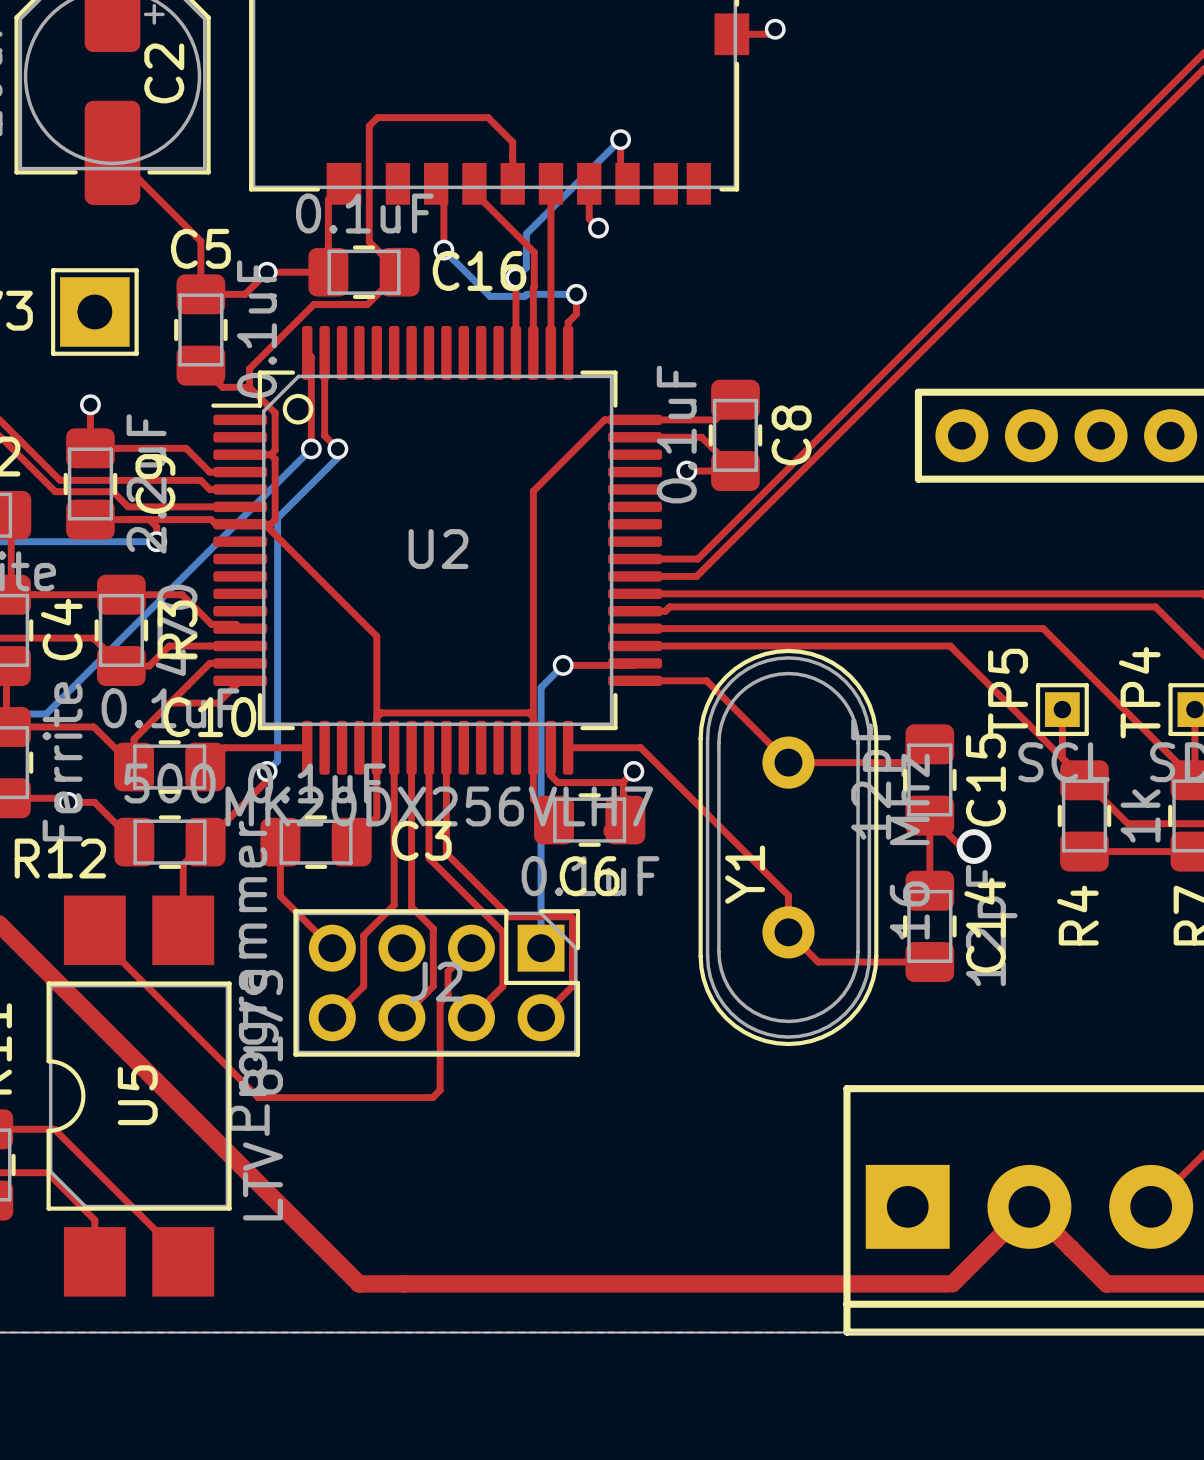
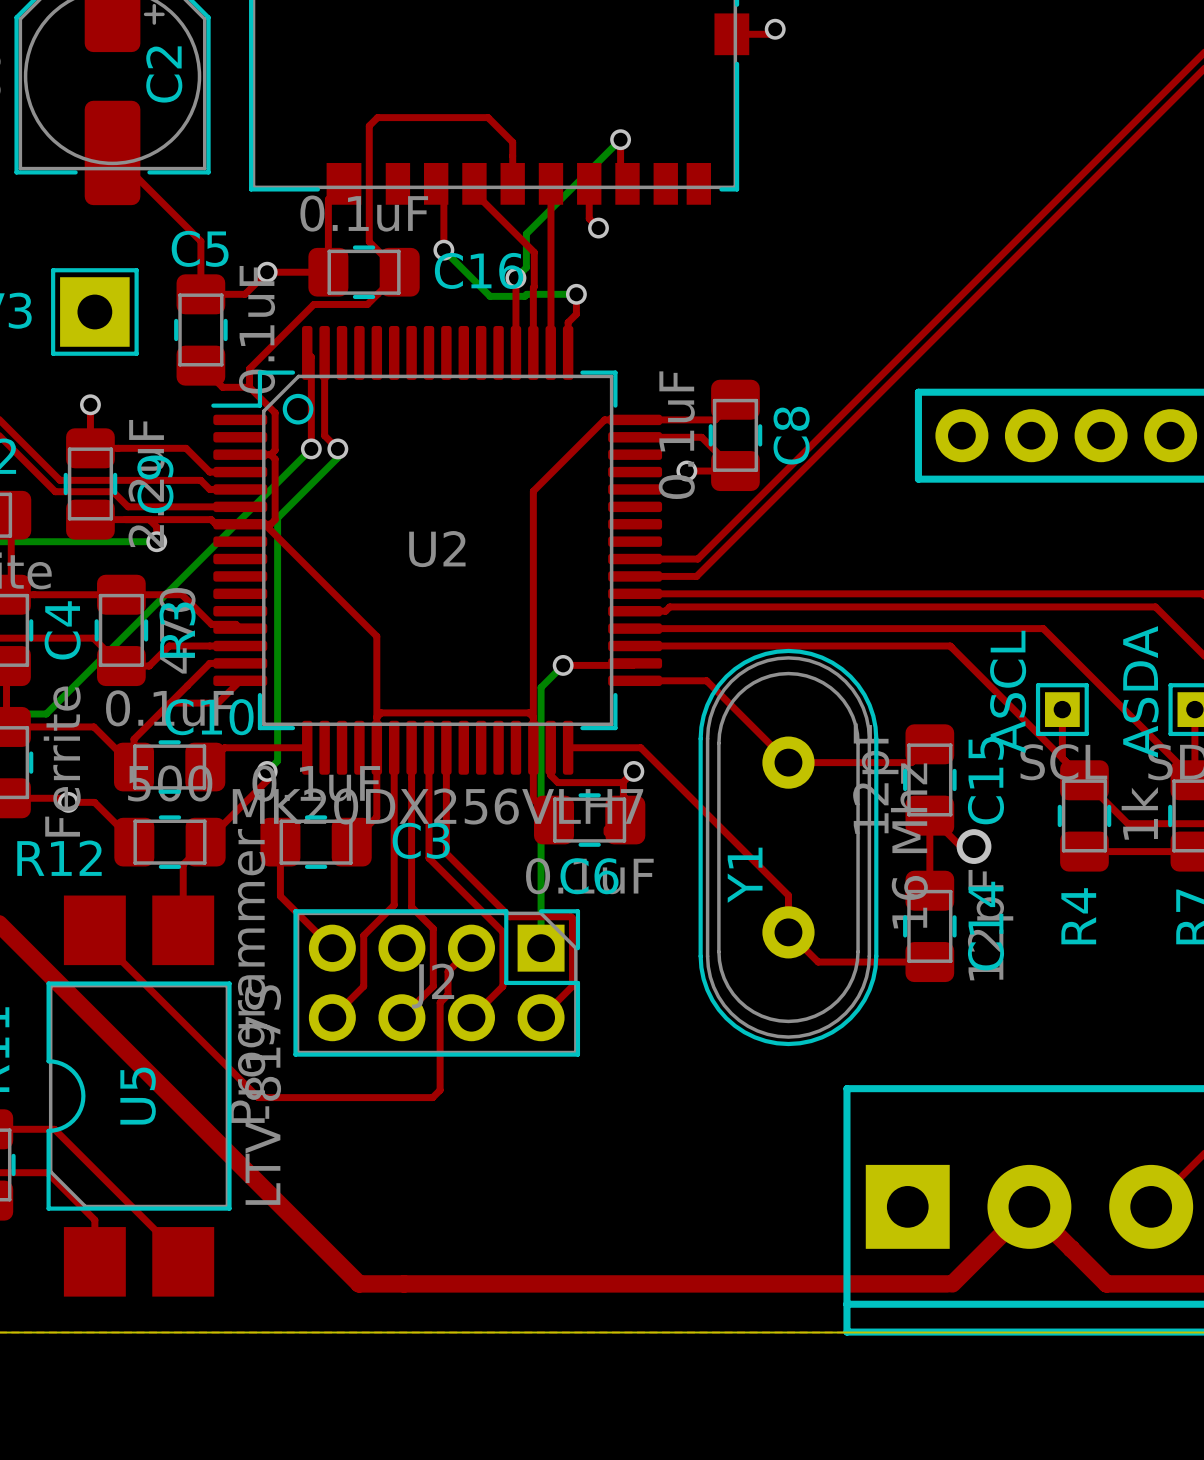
TP4 name: TP4 (1139, 692) -> ASDA (1140, 691)
TP5 name: TP5 (1008, 693) -> ASCL (1008, 691)

